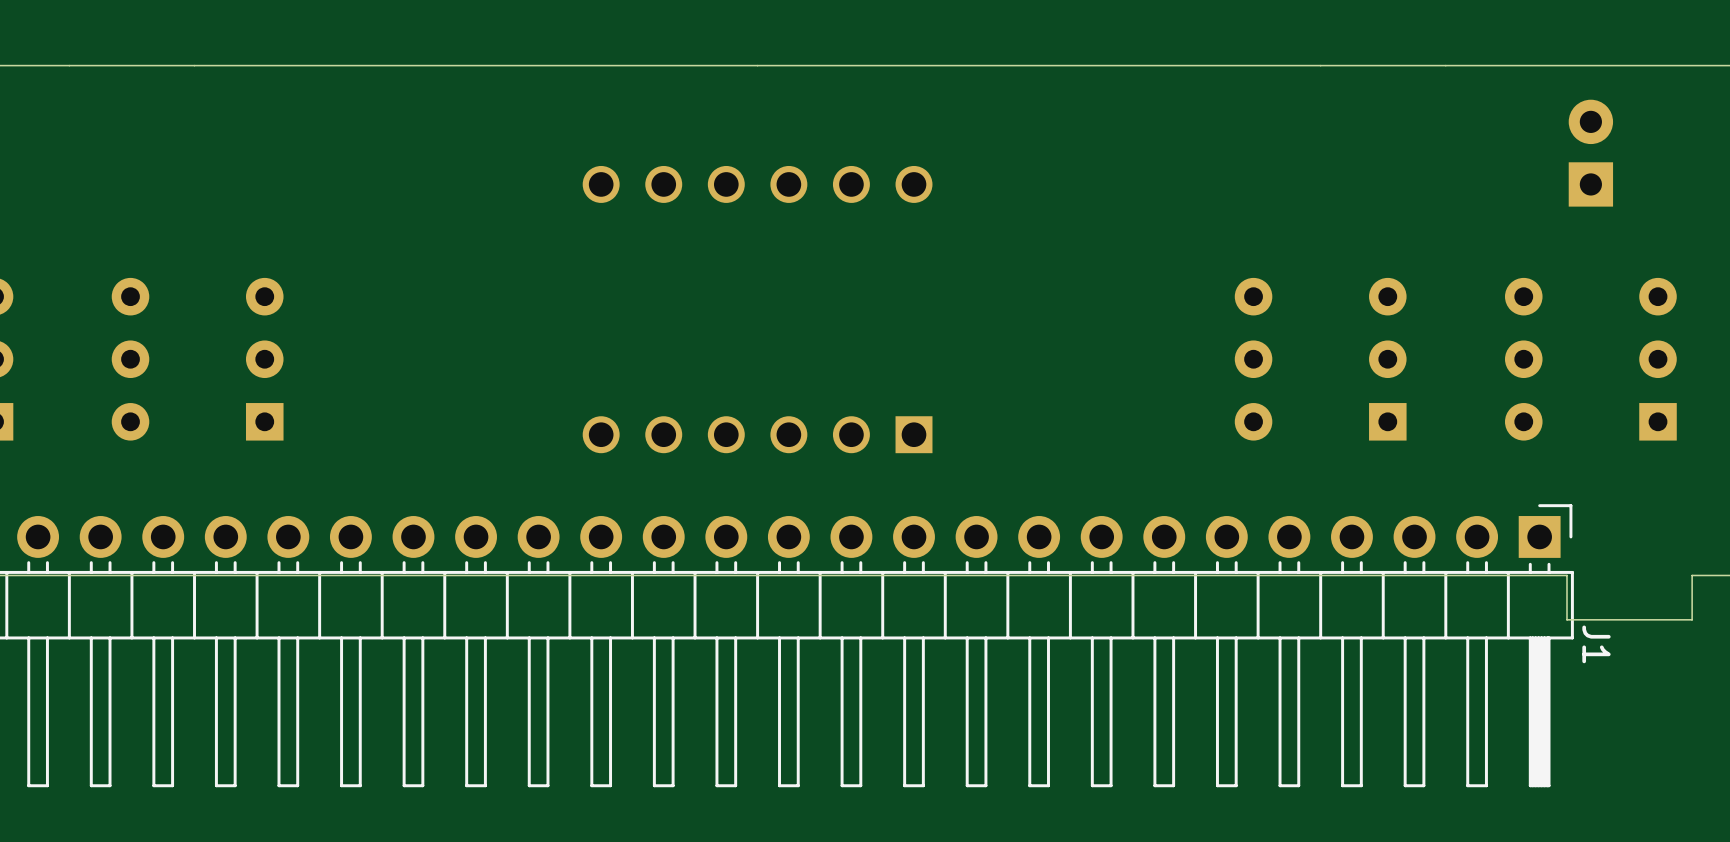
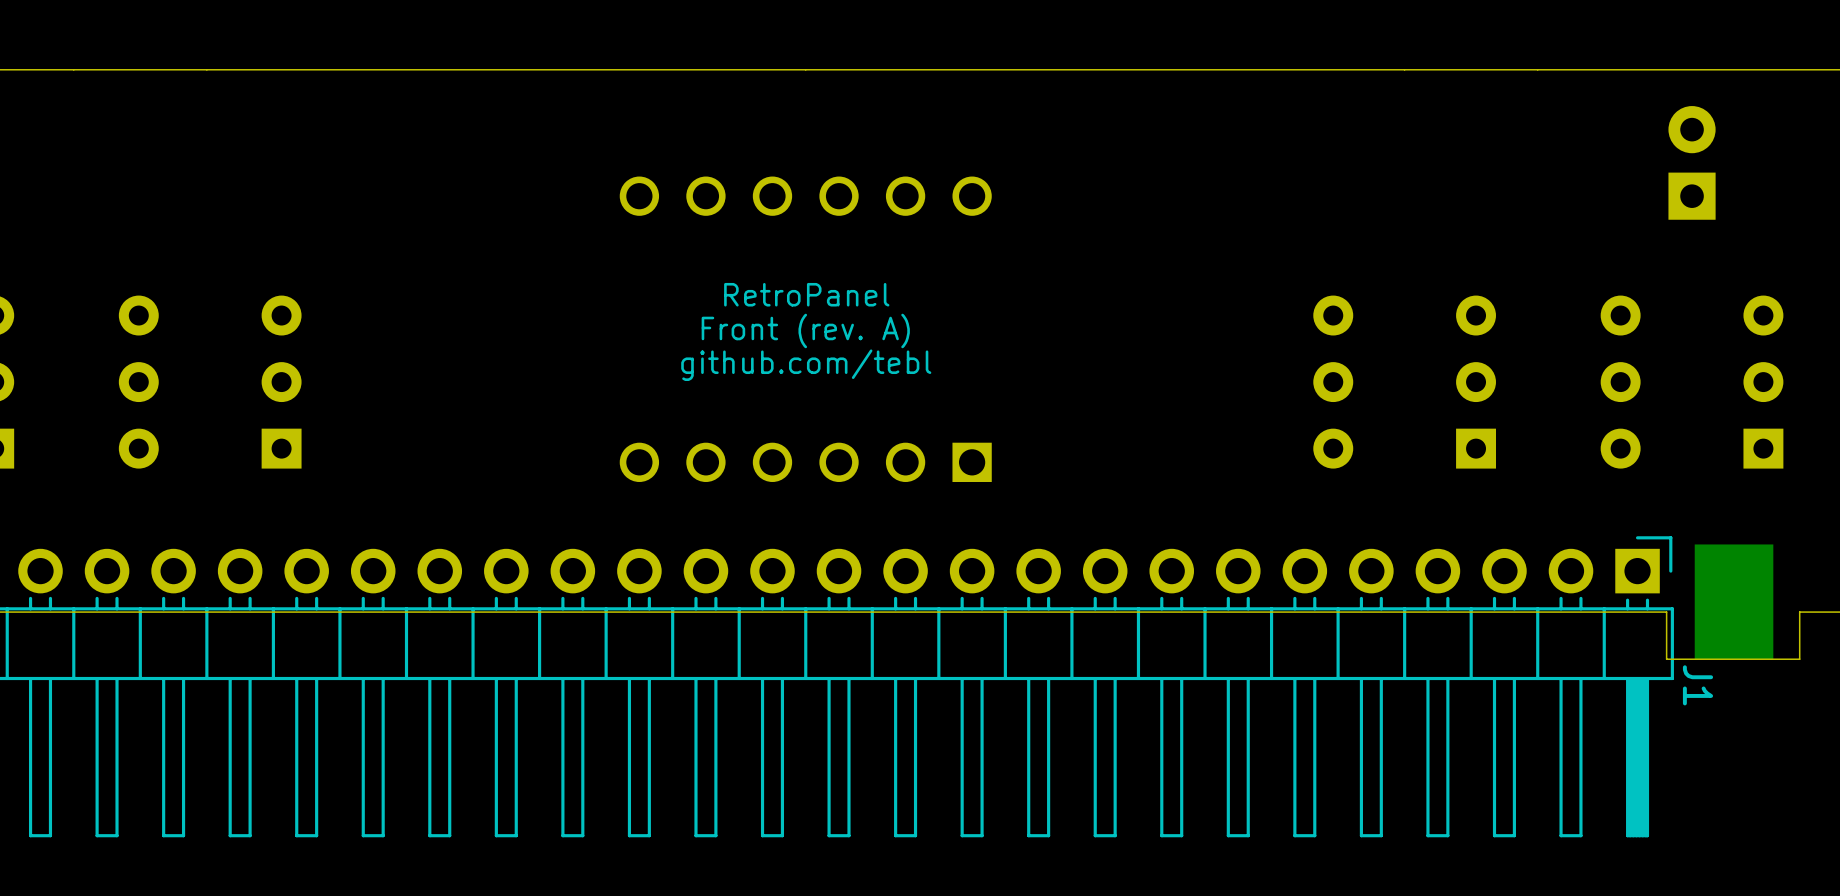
text: none -> RetroPanel (806, 294)
text: none -> Front (rev. A) (805, 330)
text: none -> github.com/tebl (806, 365)
part: none -> (1734, 602)

